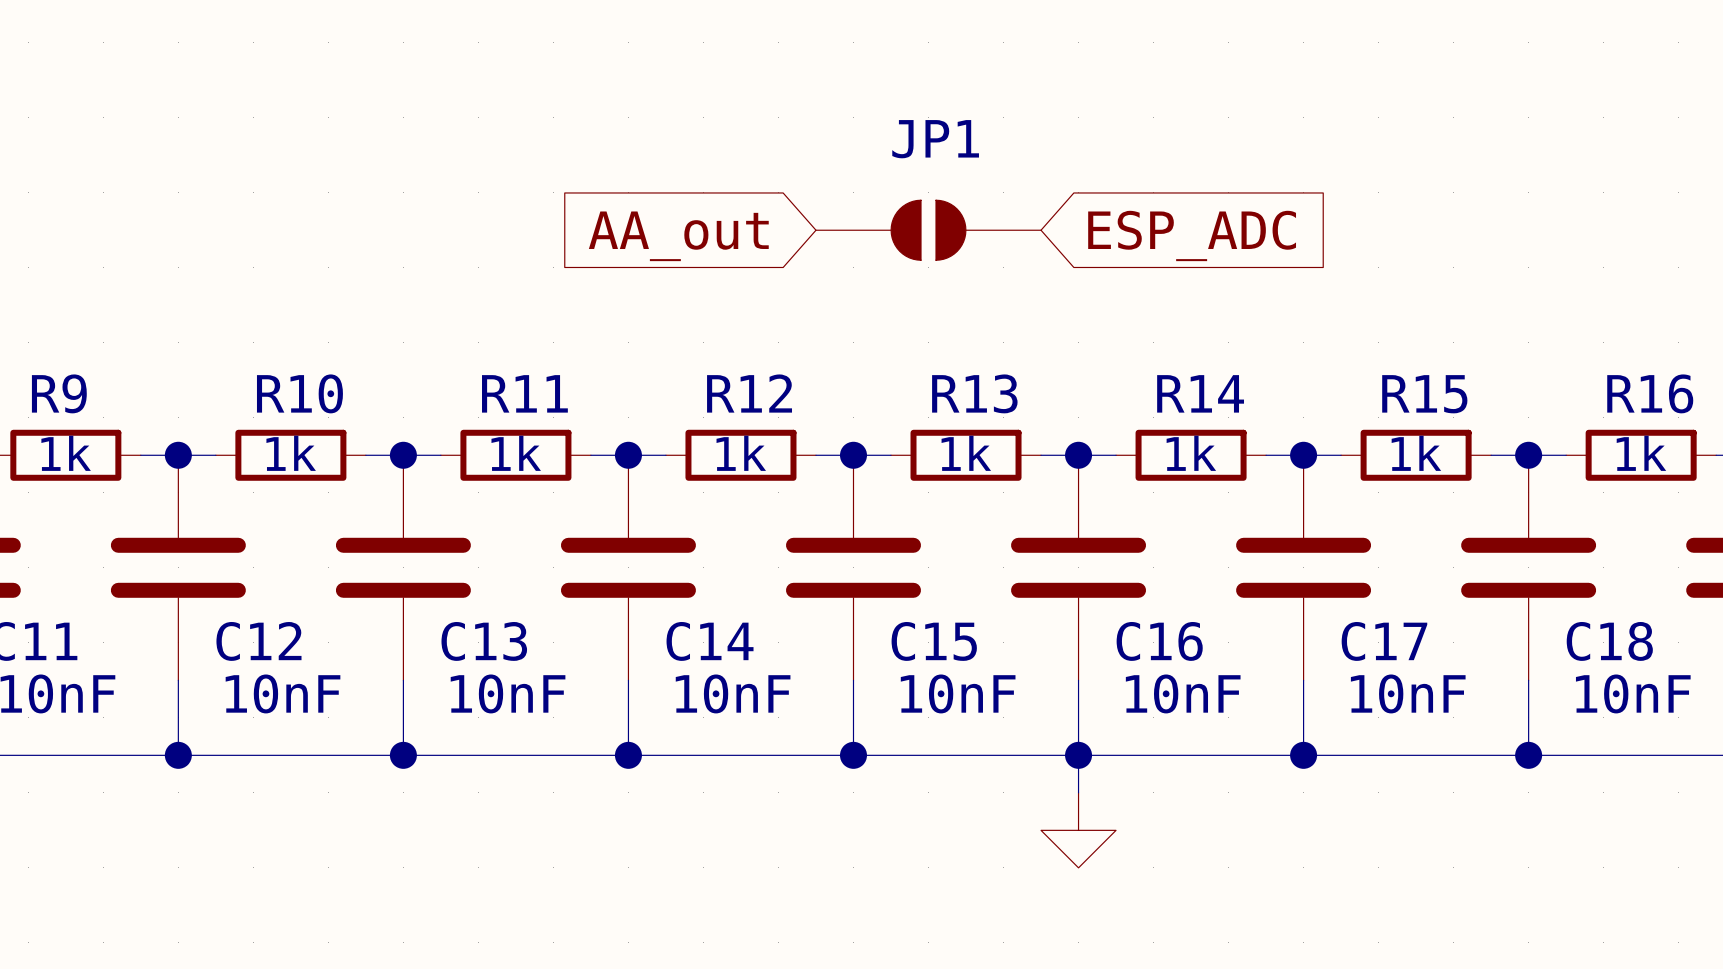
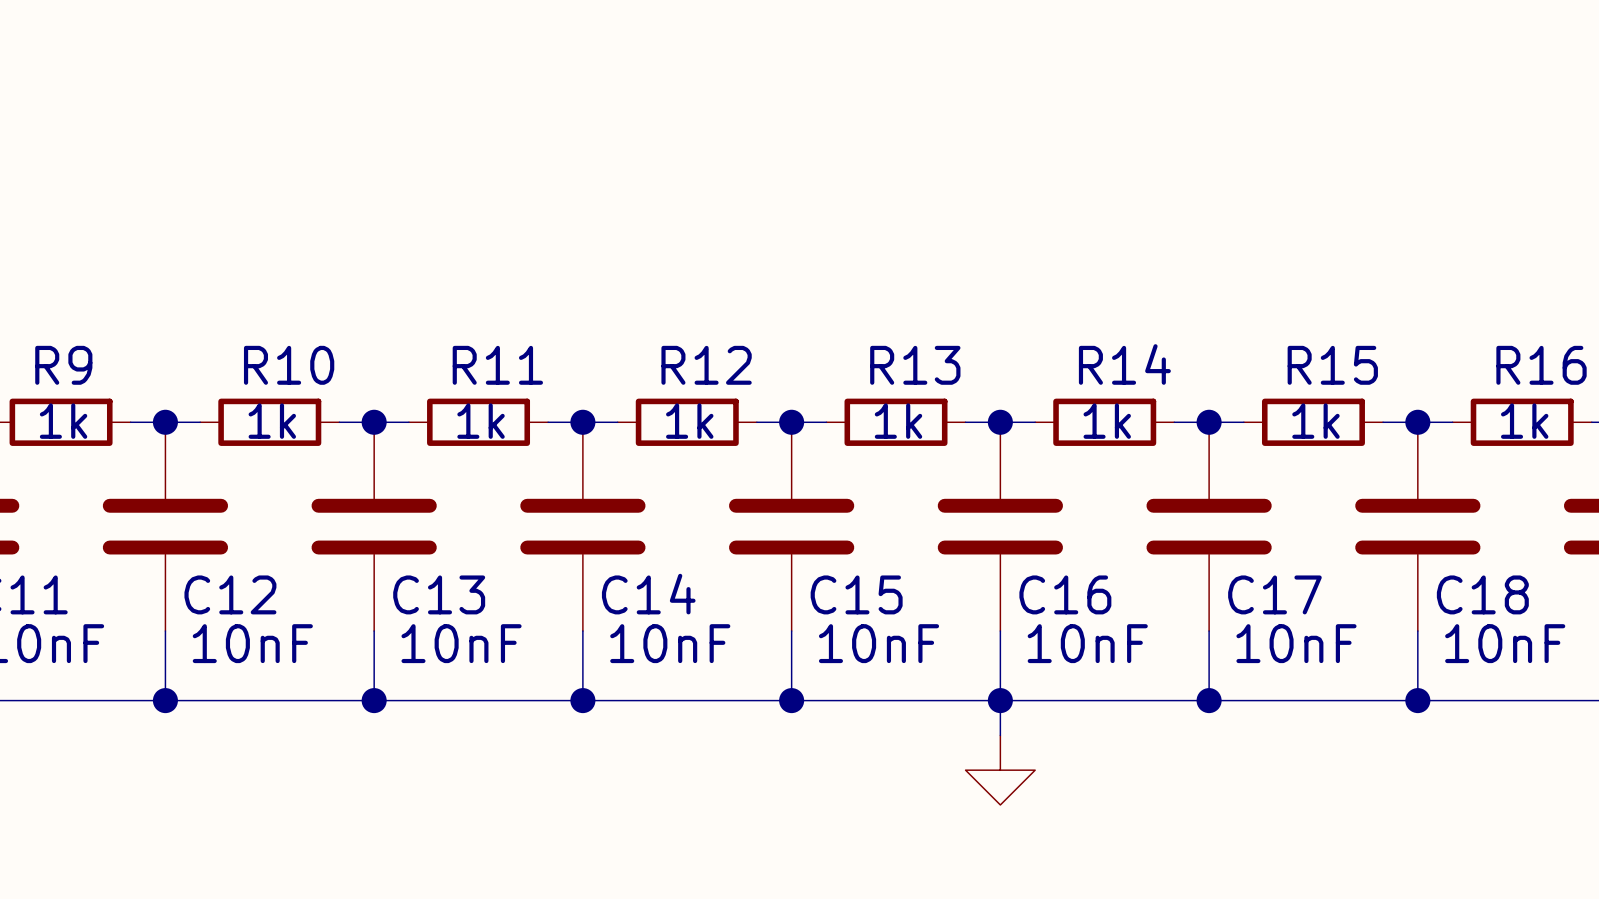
JP1: (928, 230) -> none
global label: ESP_ADC (1192, 235) -> none
global label: AA_out (678, 236) -> none

